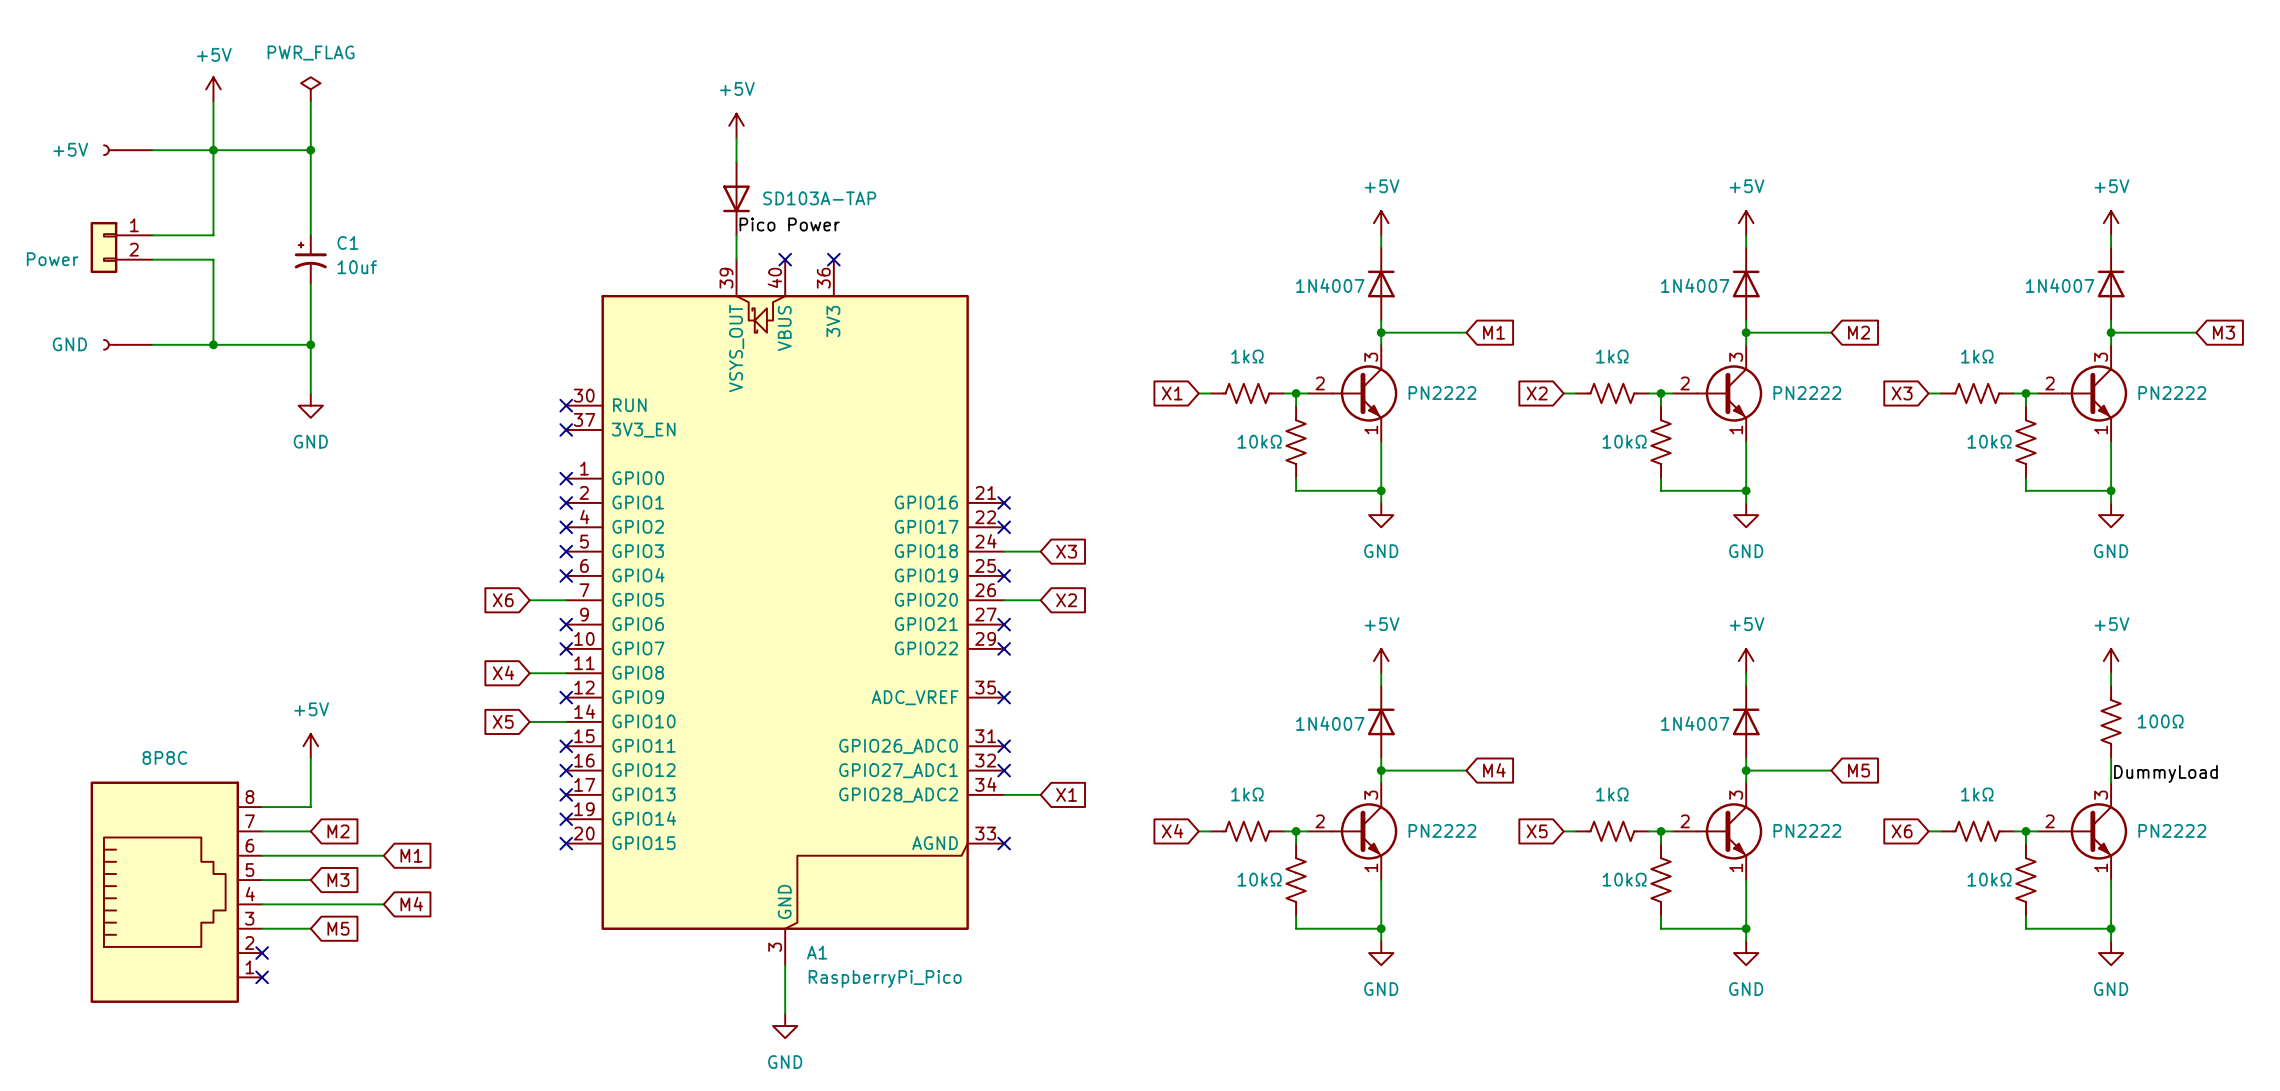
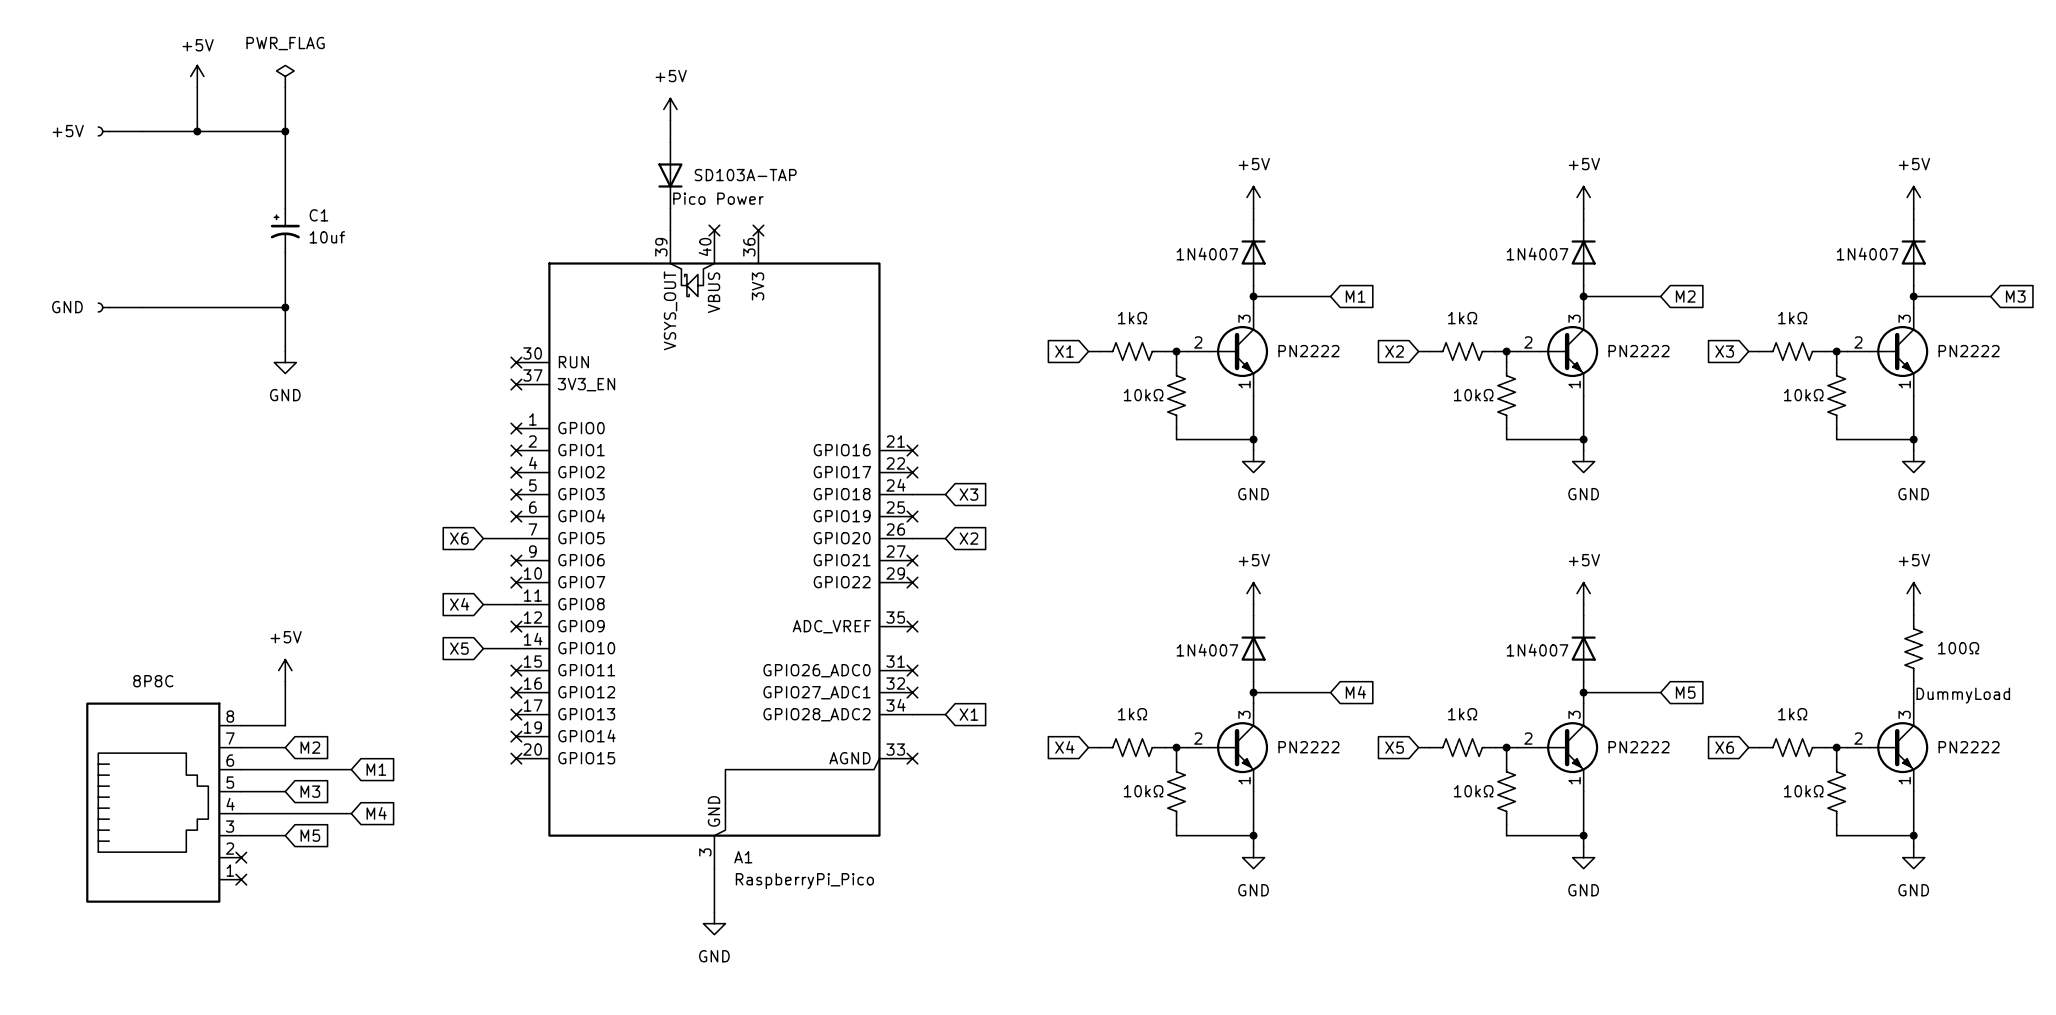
wire: (213, 150) (213, 235) (152, 235) -> none
part: Power (121, 247) -> none
wire: (152, 259) (213, 259) (213, 344) -> none
junction: (213, 344) -> none

